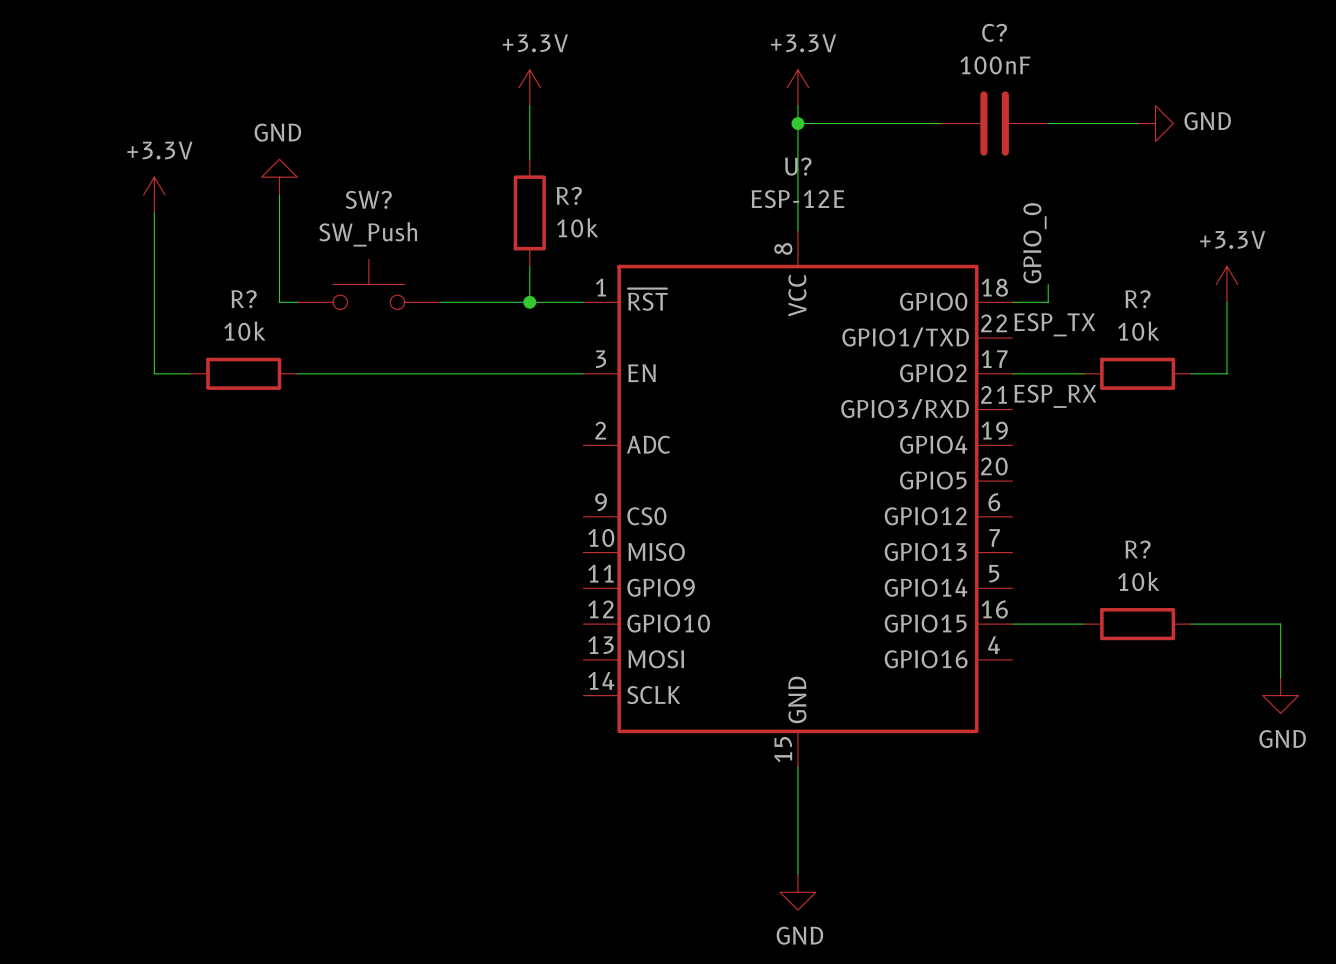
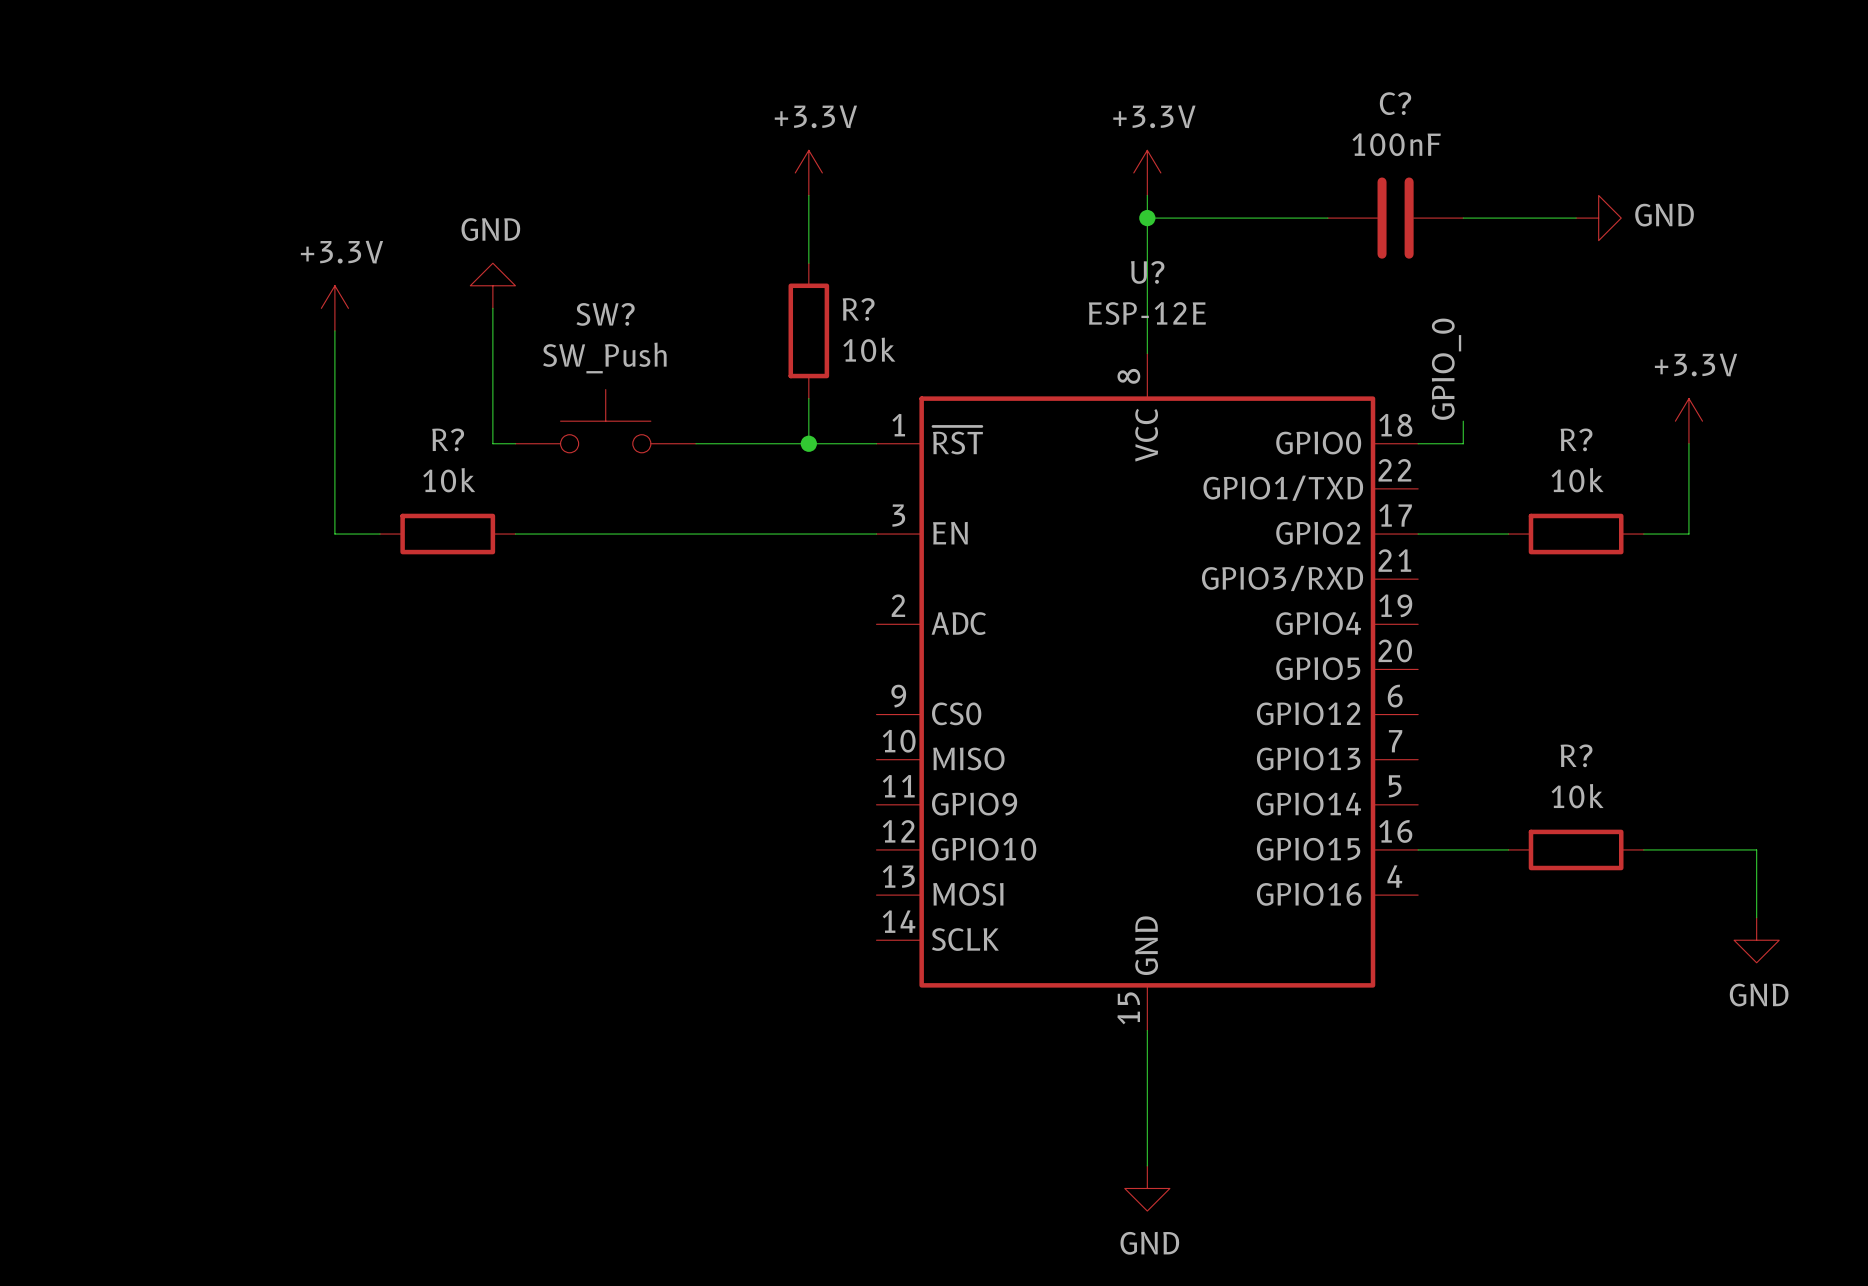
label: ESP_TX (1054, 324) -> none
label: ESP_RX (1055, 396) -> none

